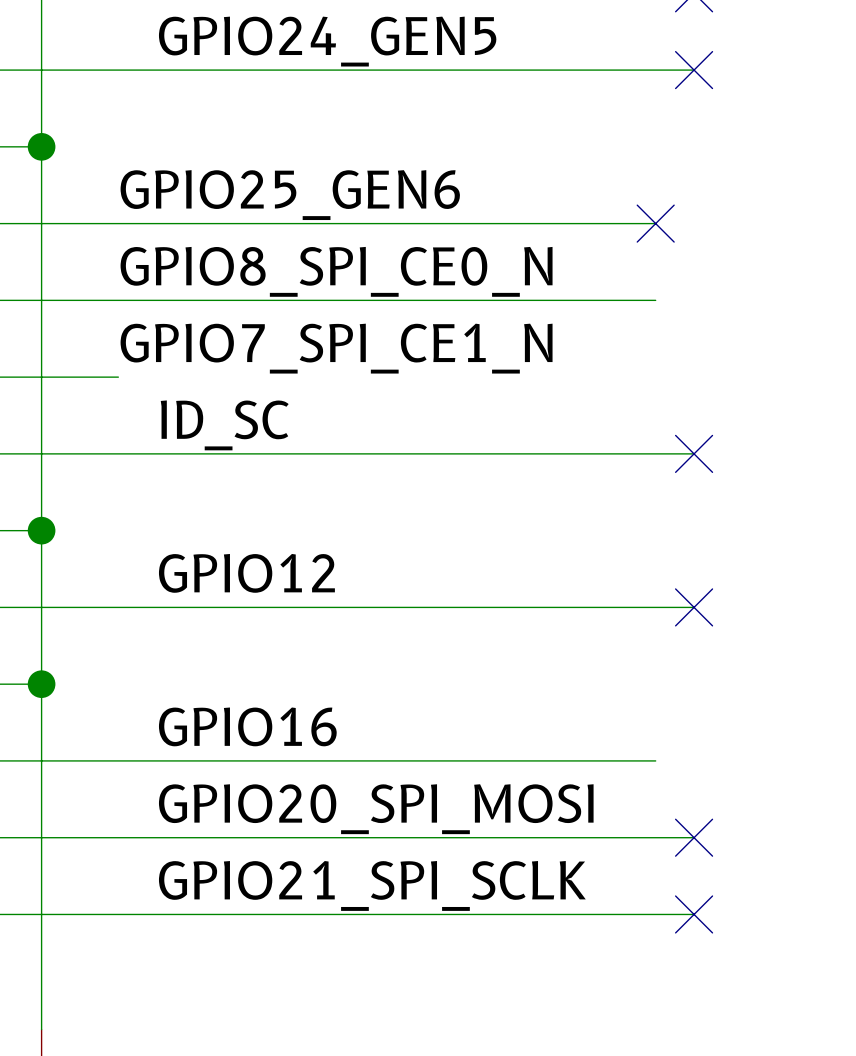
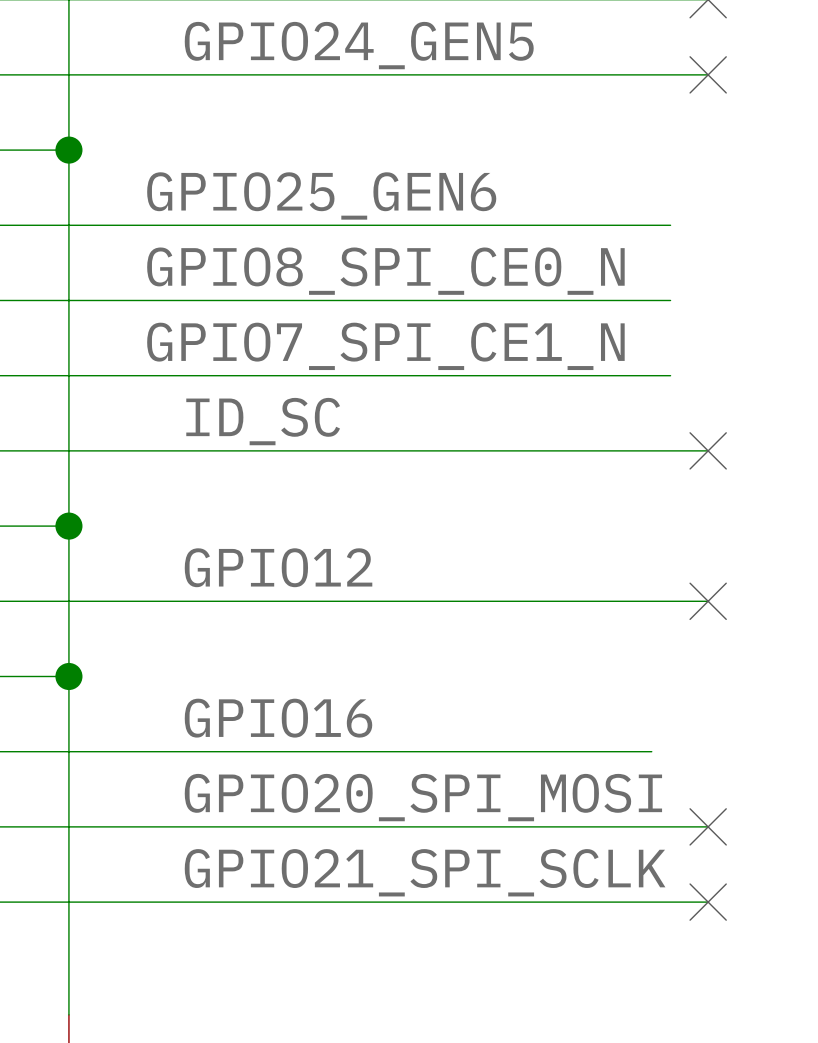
no-connect mark: (655, 223) -> none
wire: none -> (144, 375) (670, 375)
wire: (636, 760) (655, 760) -> none

